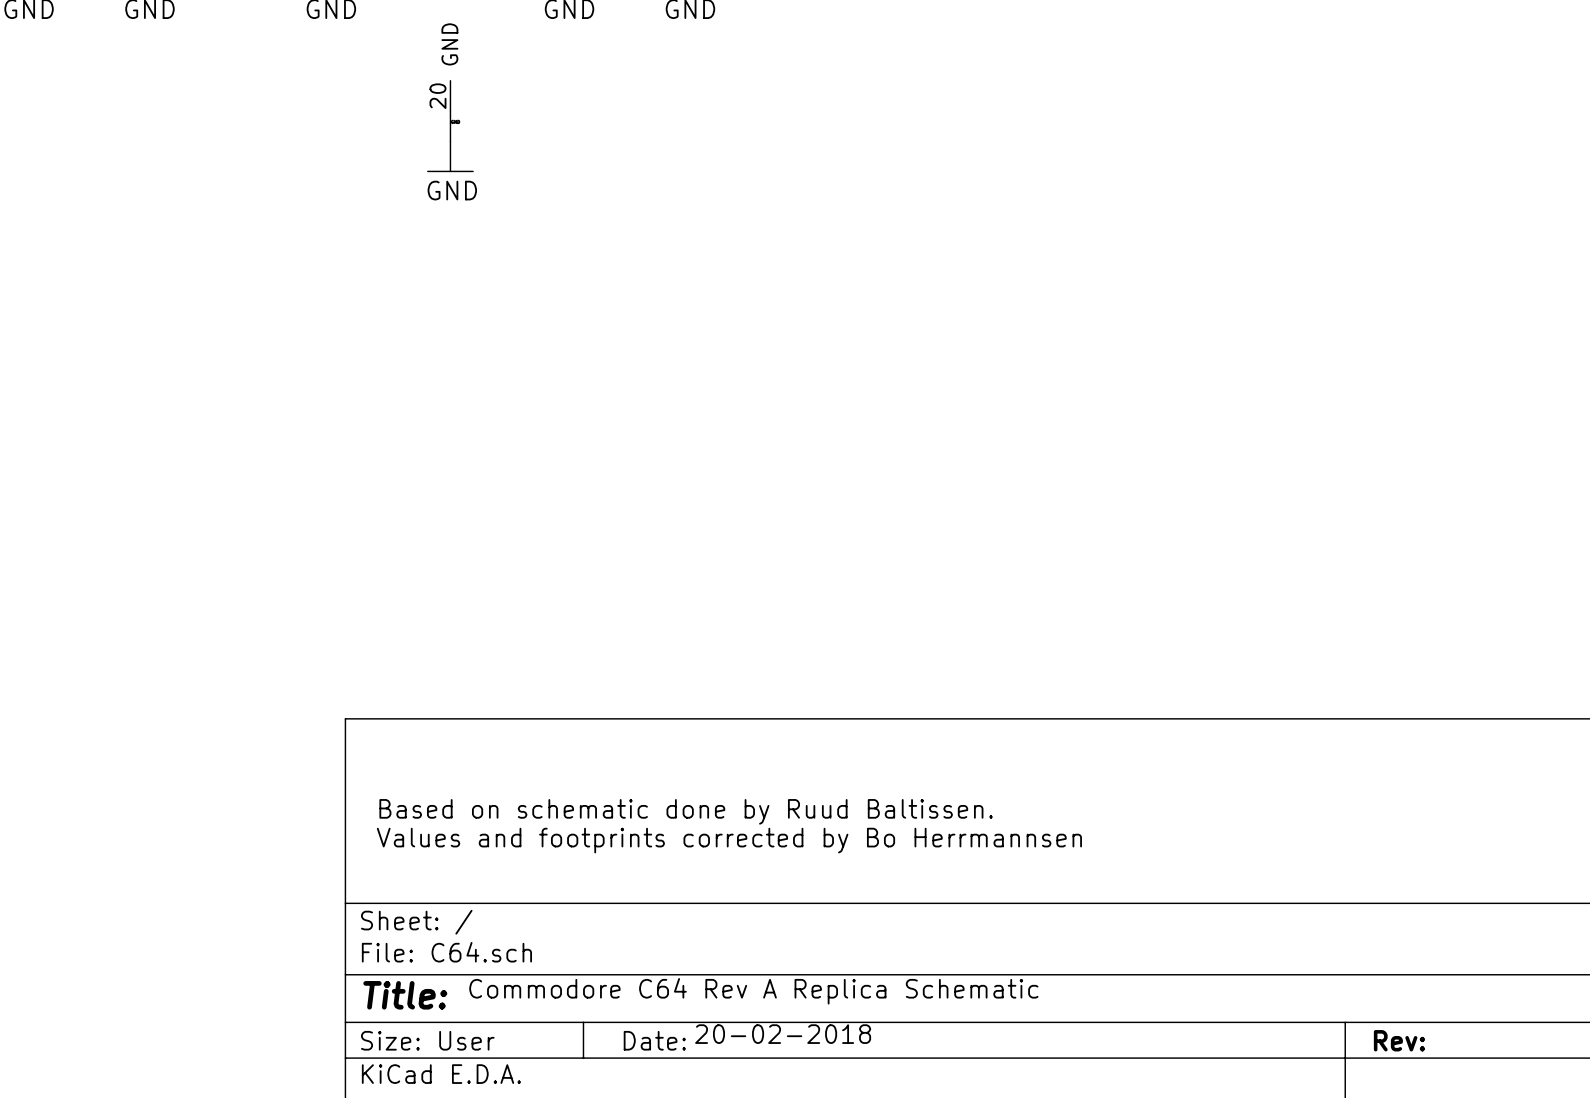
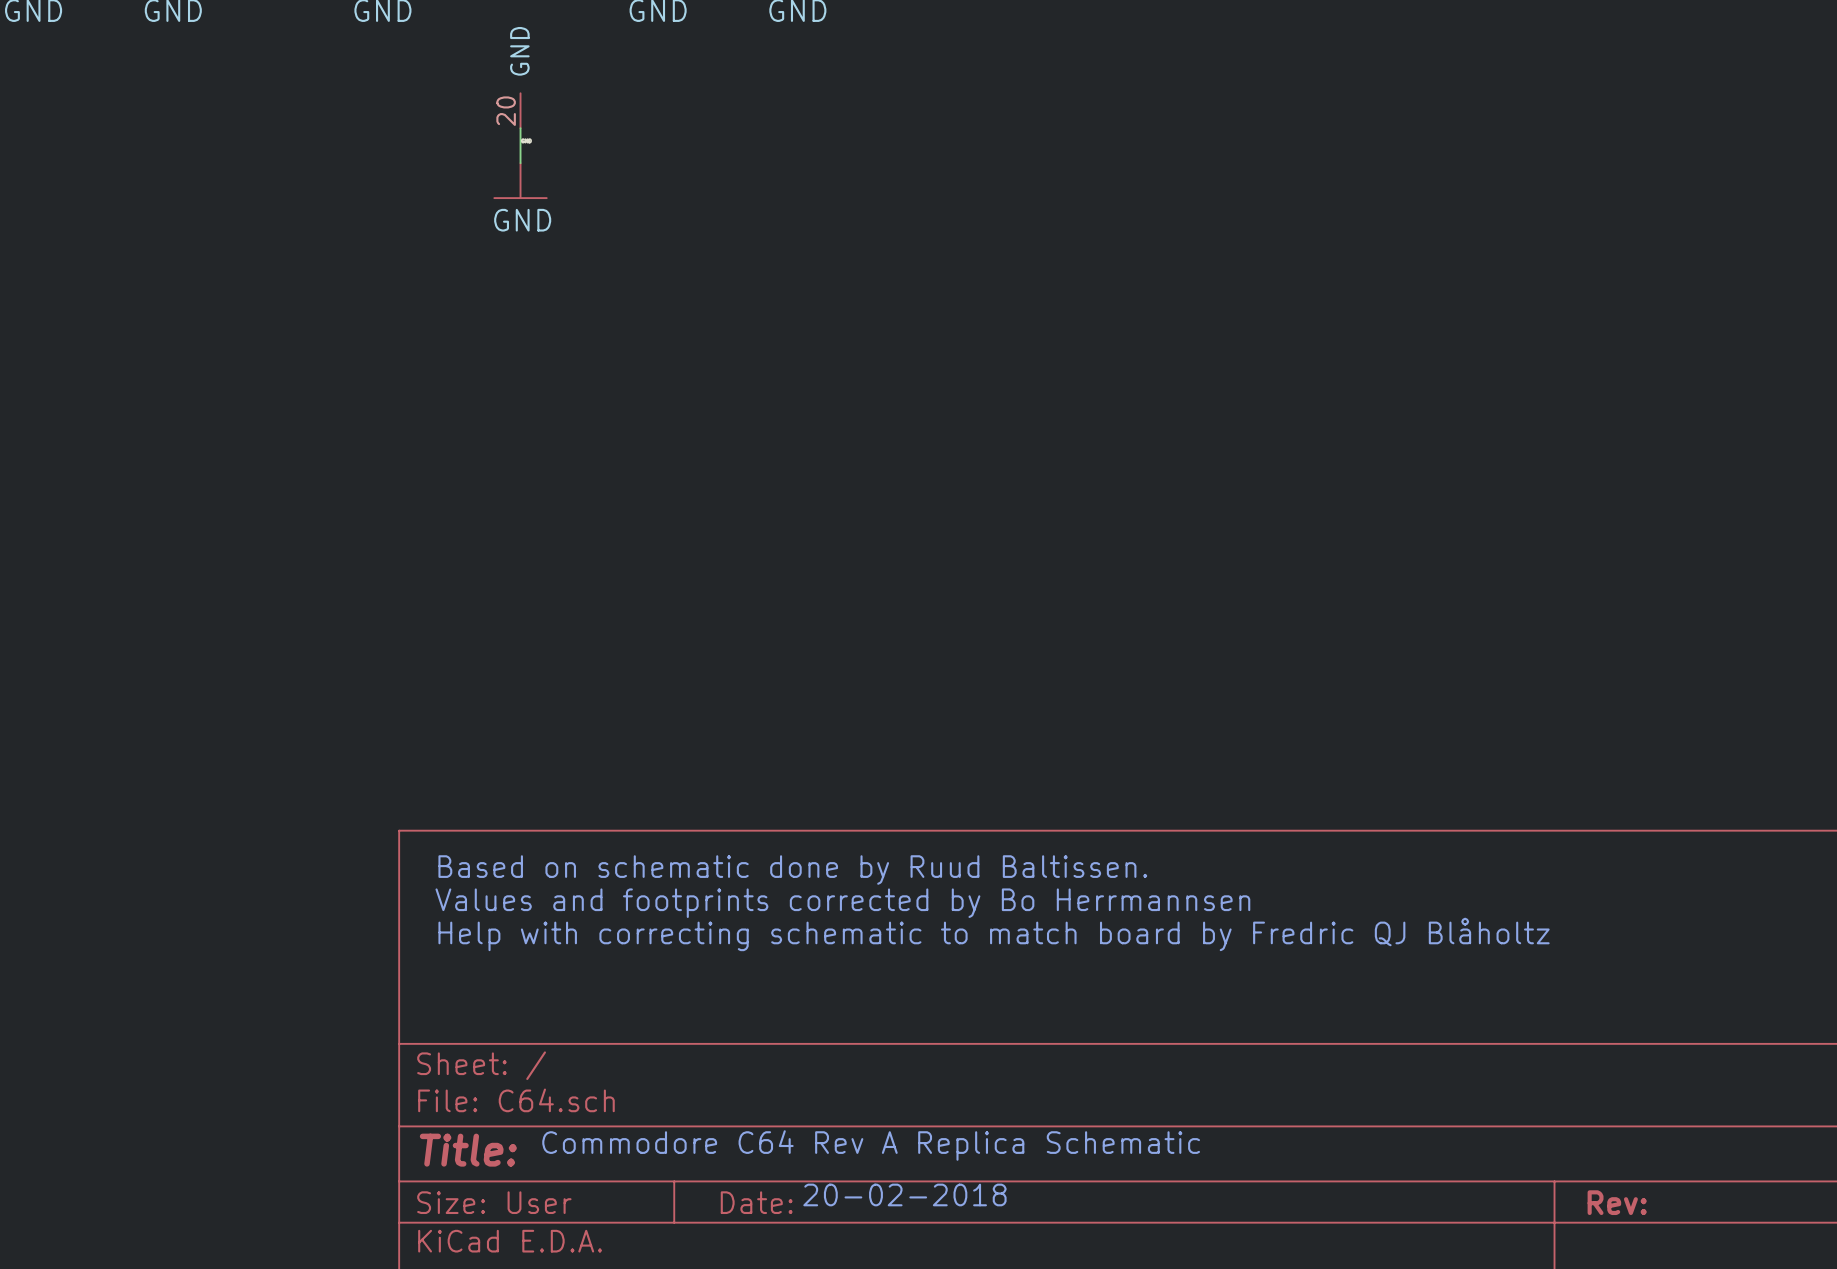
text: none -> Help with correcting schematic to match board by Fredric QJ Blåholtz (994, 934)
text position: Based on schematic done by Ruud Baltissen. (686, 811) -> Based on schematic done by Ruud Baltissen. (792, 870)
text position: Values and footprints corrected by Bo Herrmannsen (729, 840) -> Values and footprints corrected by Bo Herrmannsen (842, 903)

